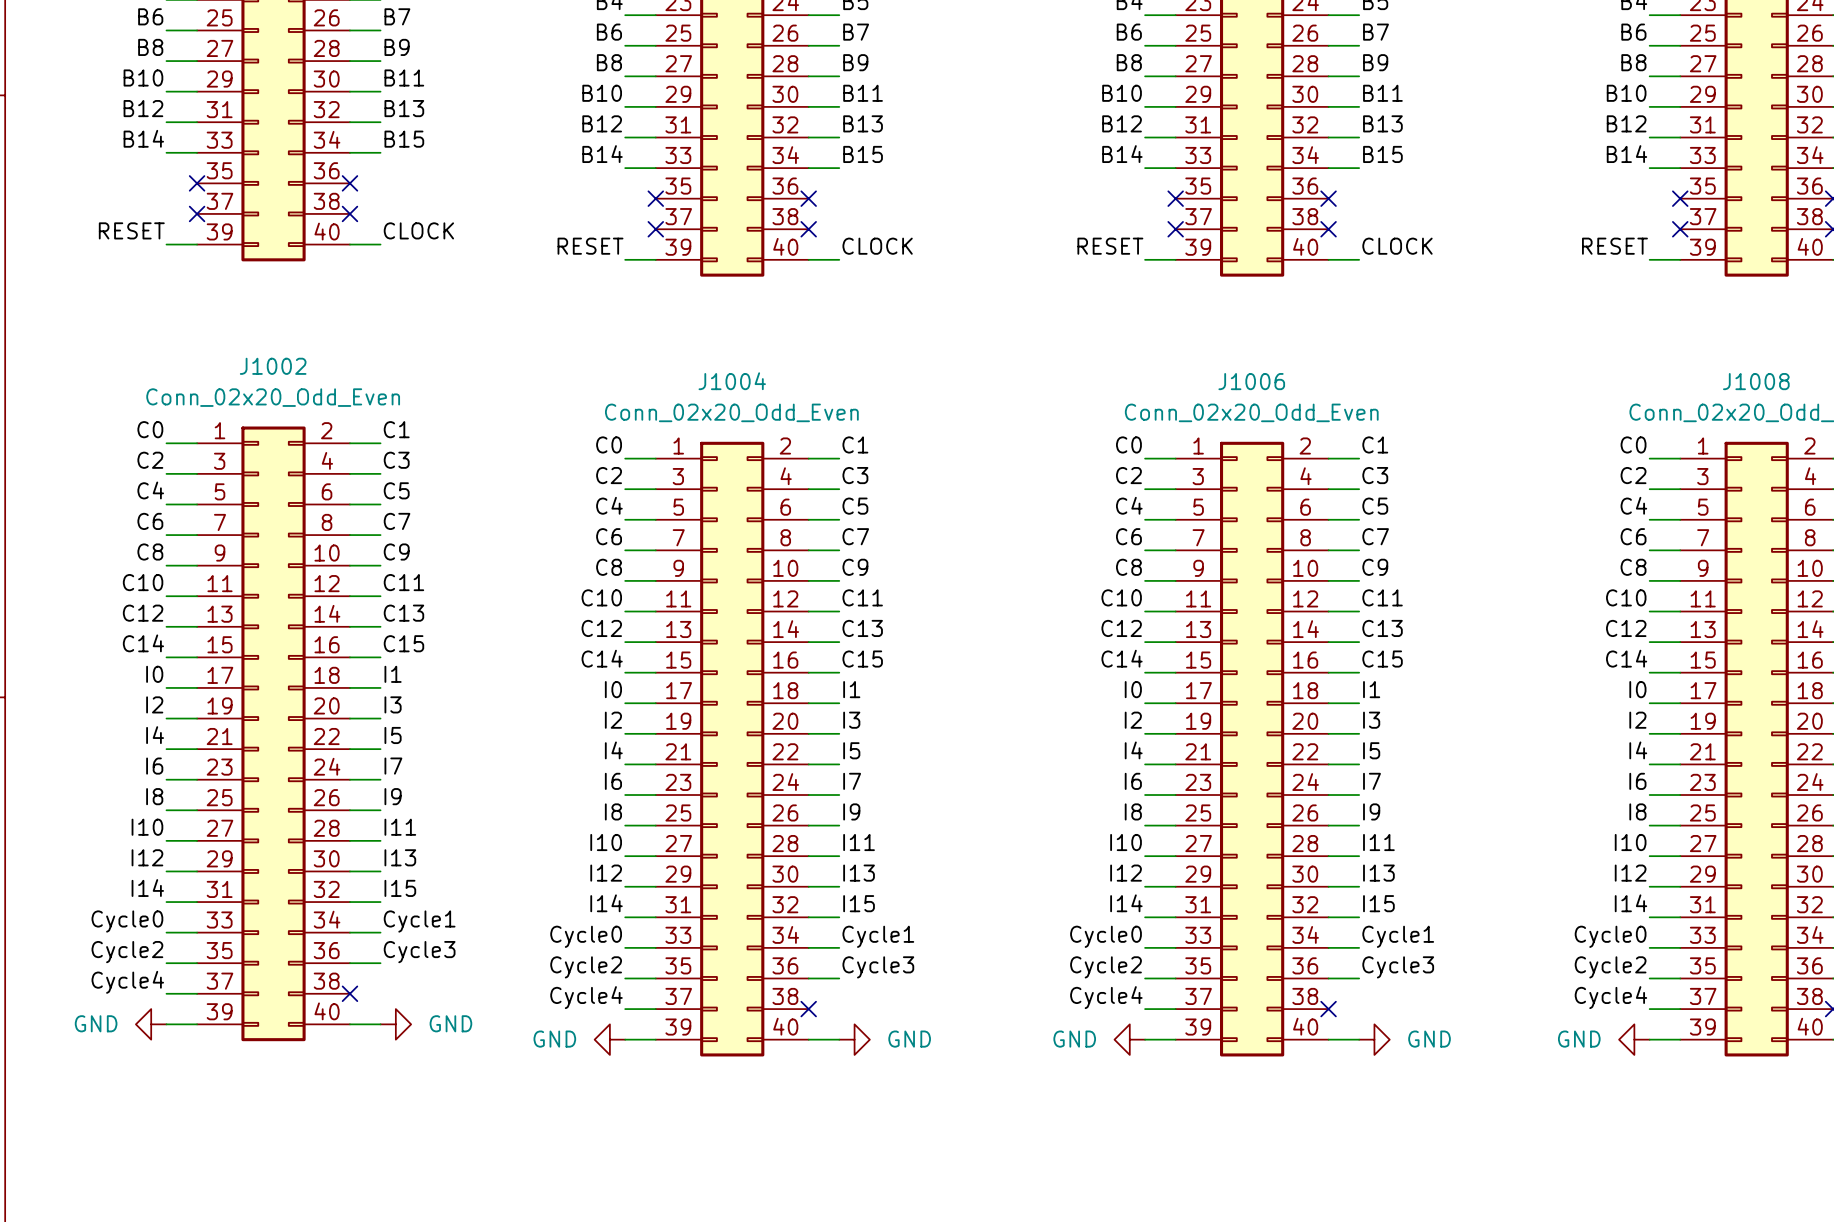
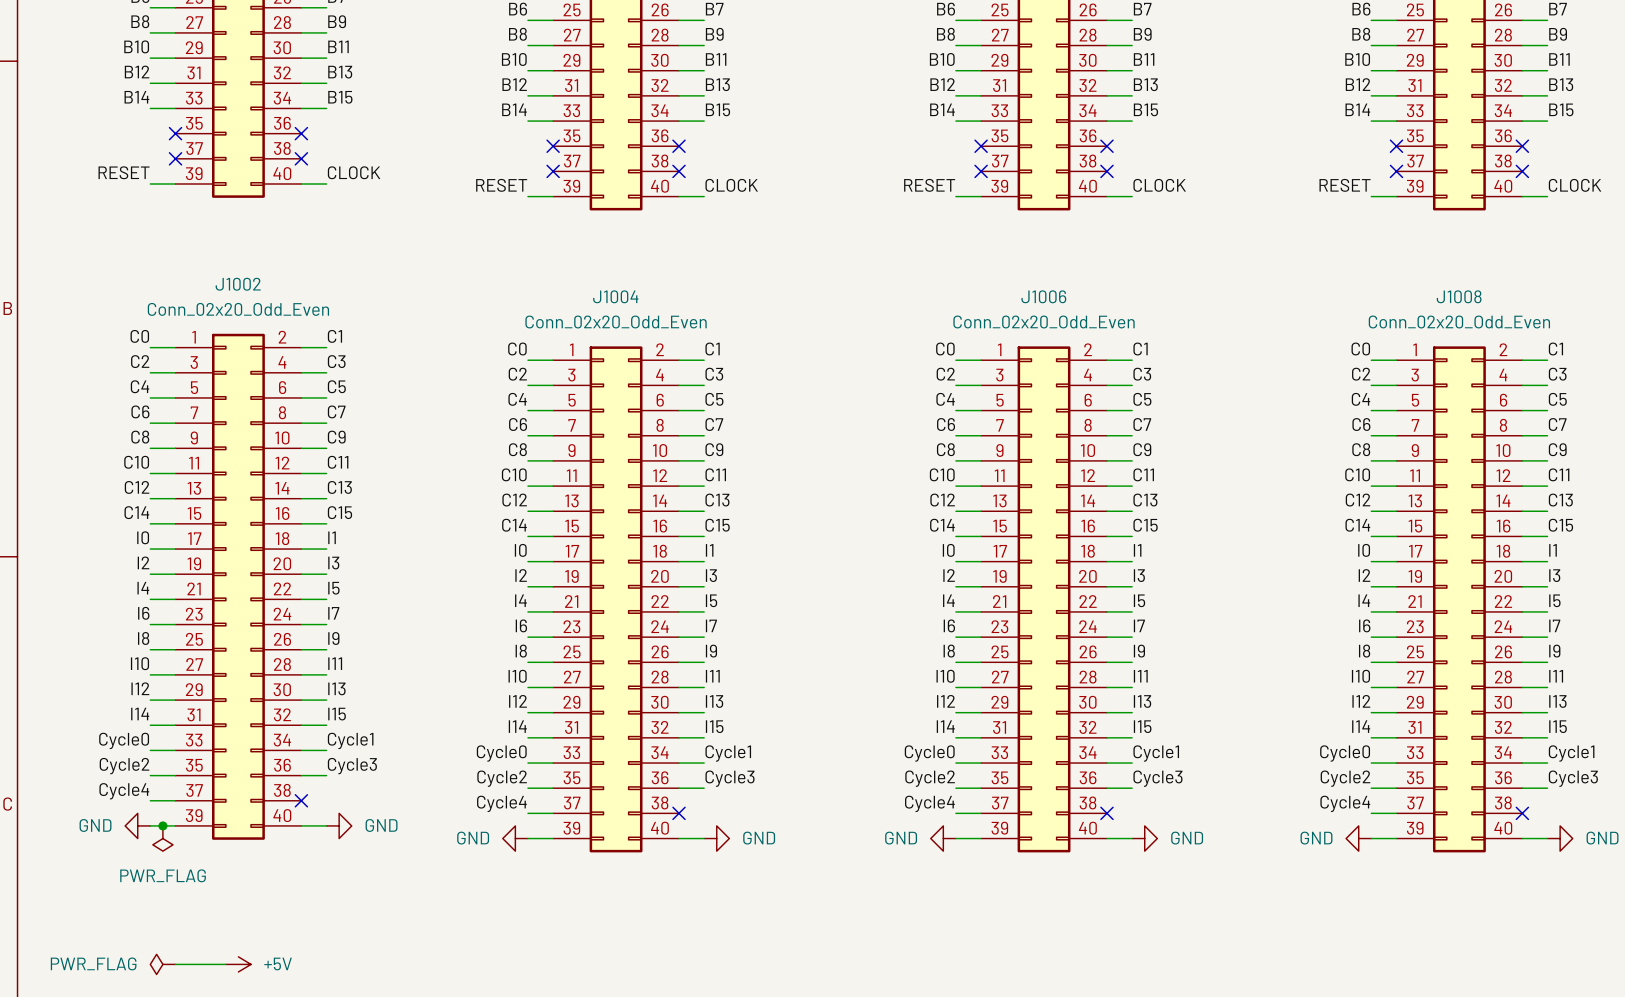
junction: none -> (162, 825)
power symbol: none -> PWR_FLAG (162, 838)
power symbol: none -> PWR_FLAG (162, 964)
wire: none -> (175, 964) (225, 964)
power symbol: none -> +5V (238, 964)

